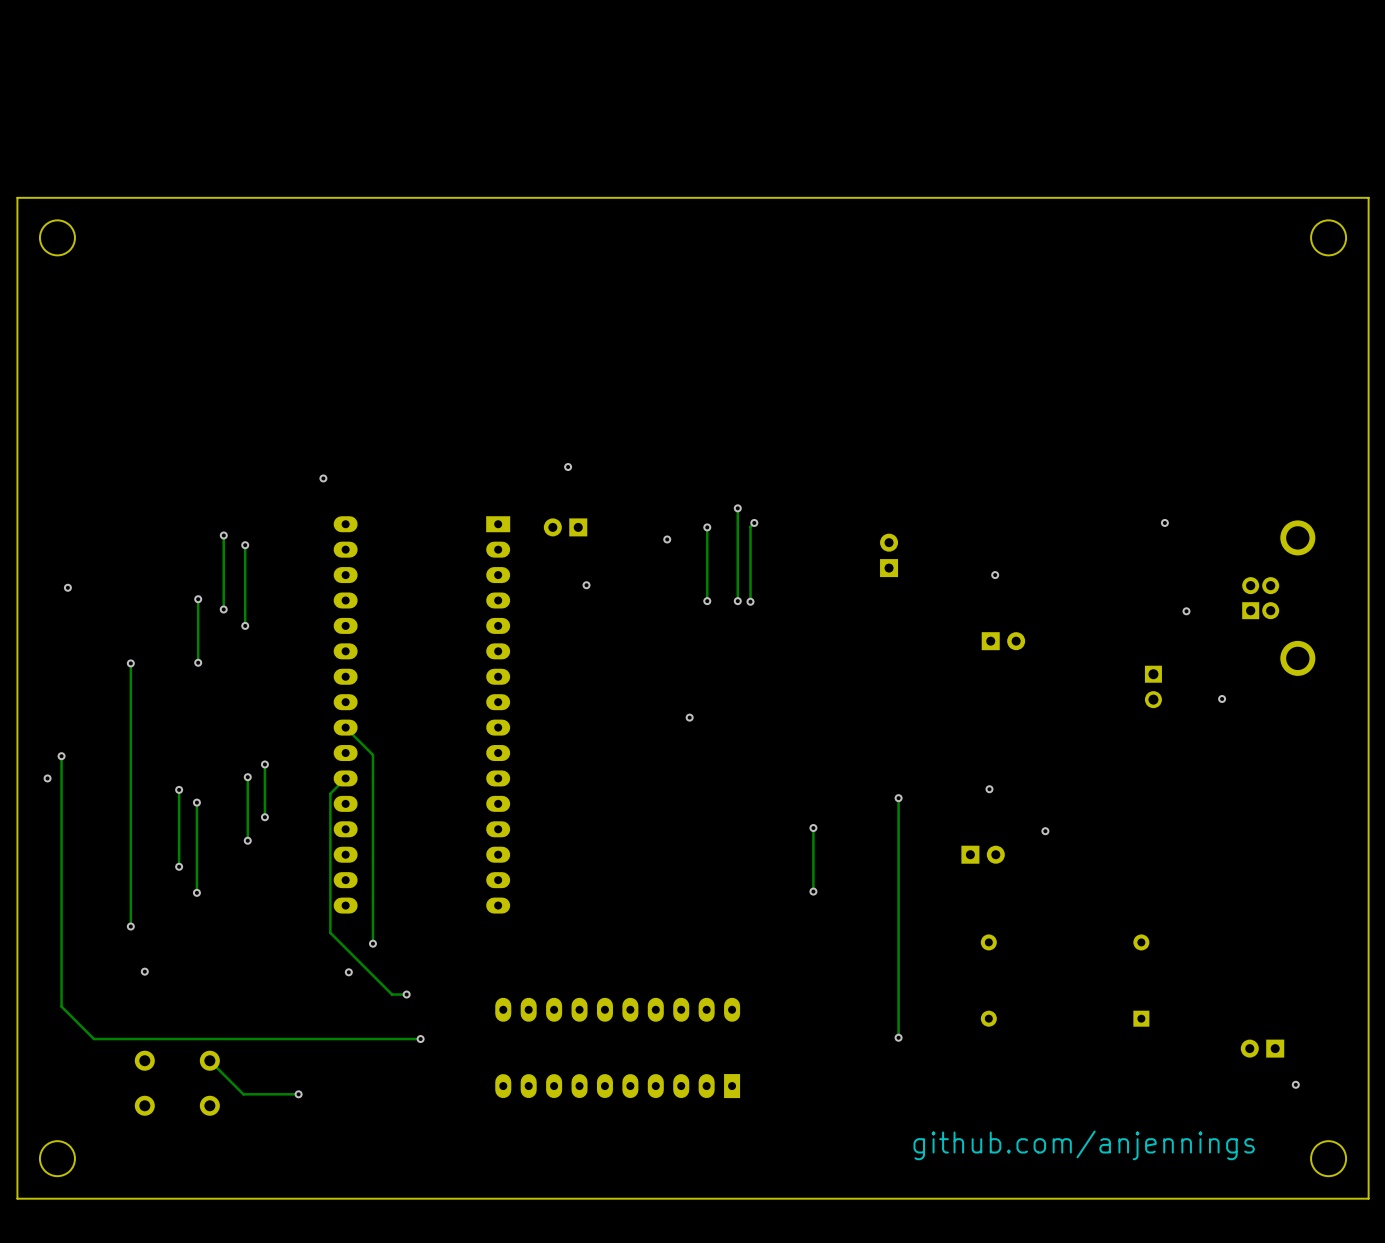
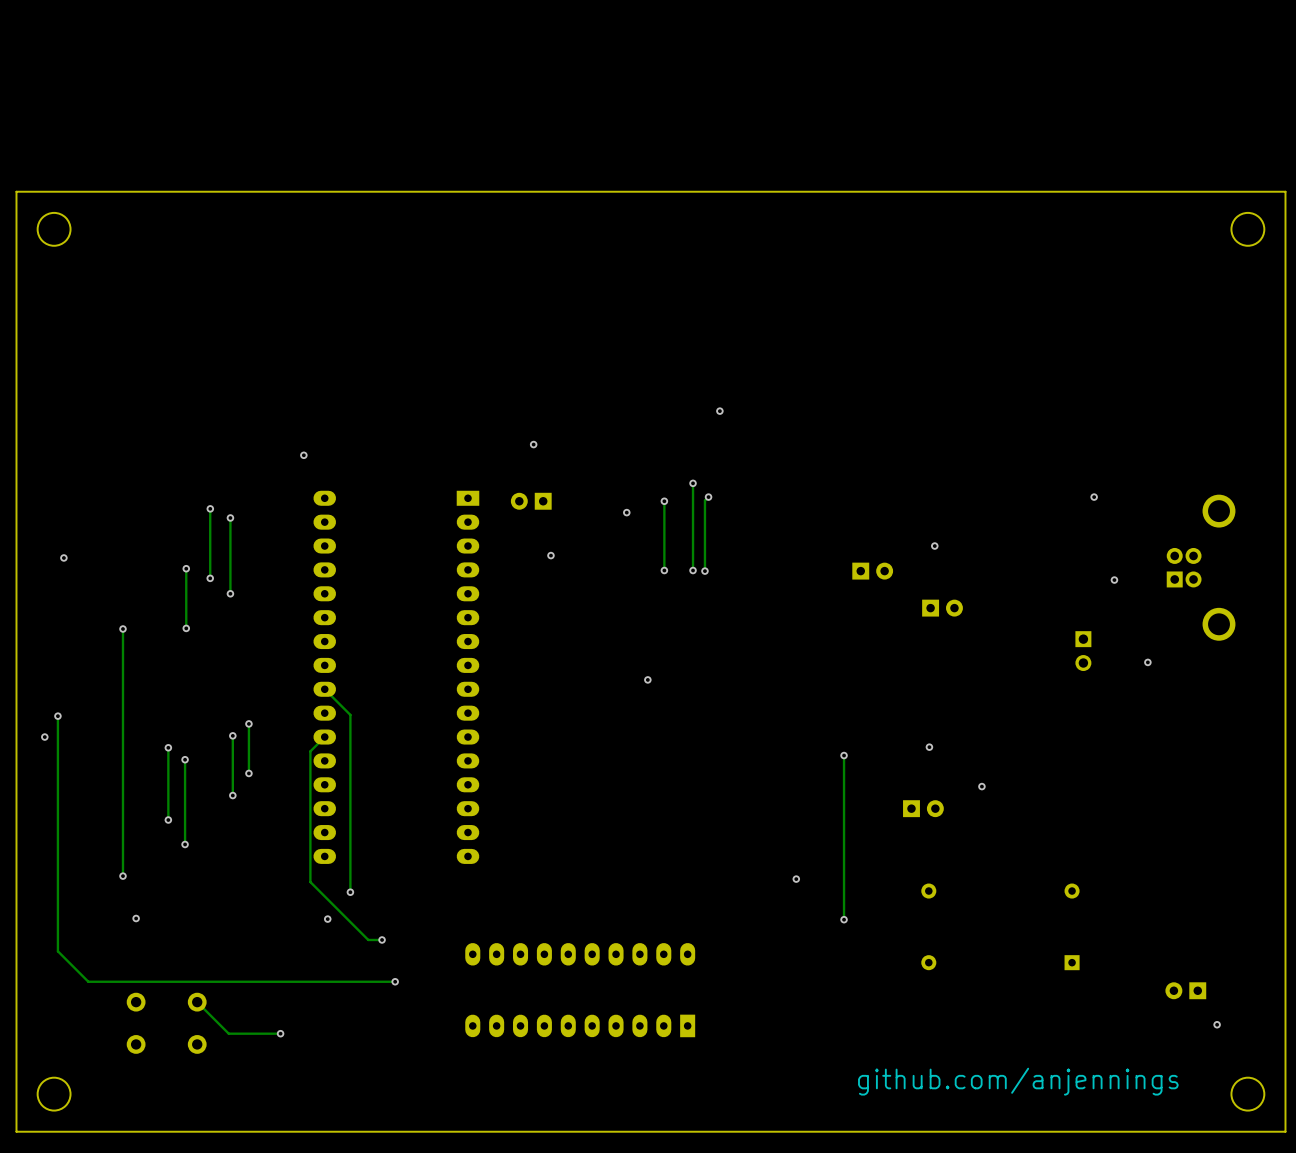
via: none -> (719, 411)
part rotation: 0° (889, 555) -> 90° clockwise (872, 571)
part position: (889, 555) -> (872, 571)
track: (813, 828) (813, 891) -> none
via: (813, 828) -> none
via position: (813, 891) -> (796, 879)
track: (898, 972) (898, 1037) -> none
via: none -> (844, 919)
via: (898, 1037) -> none

